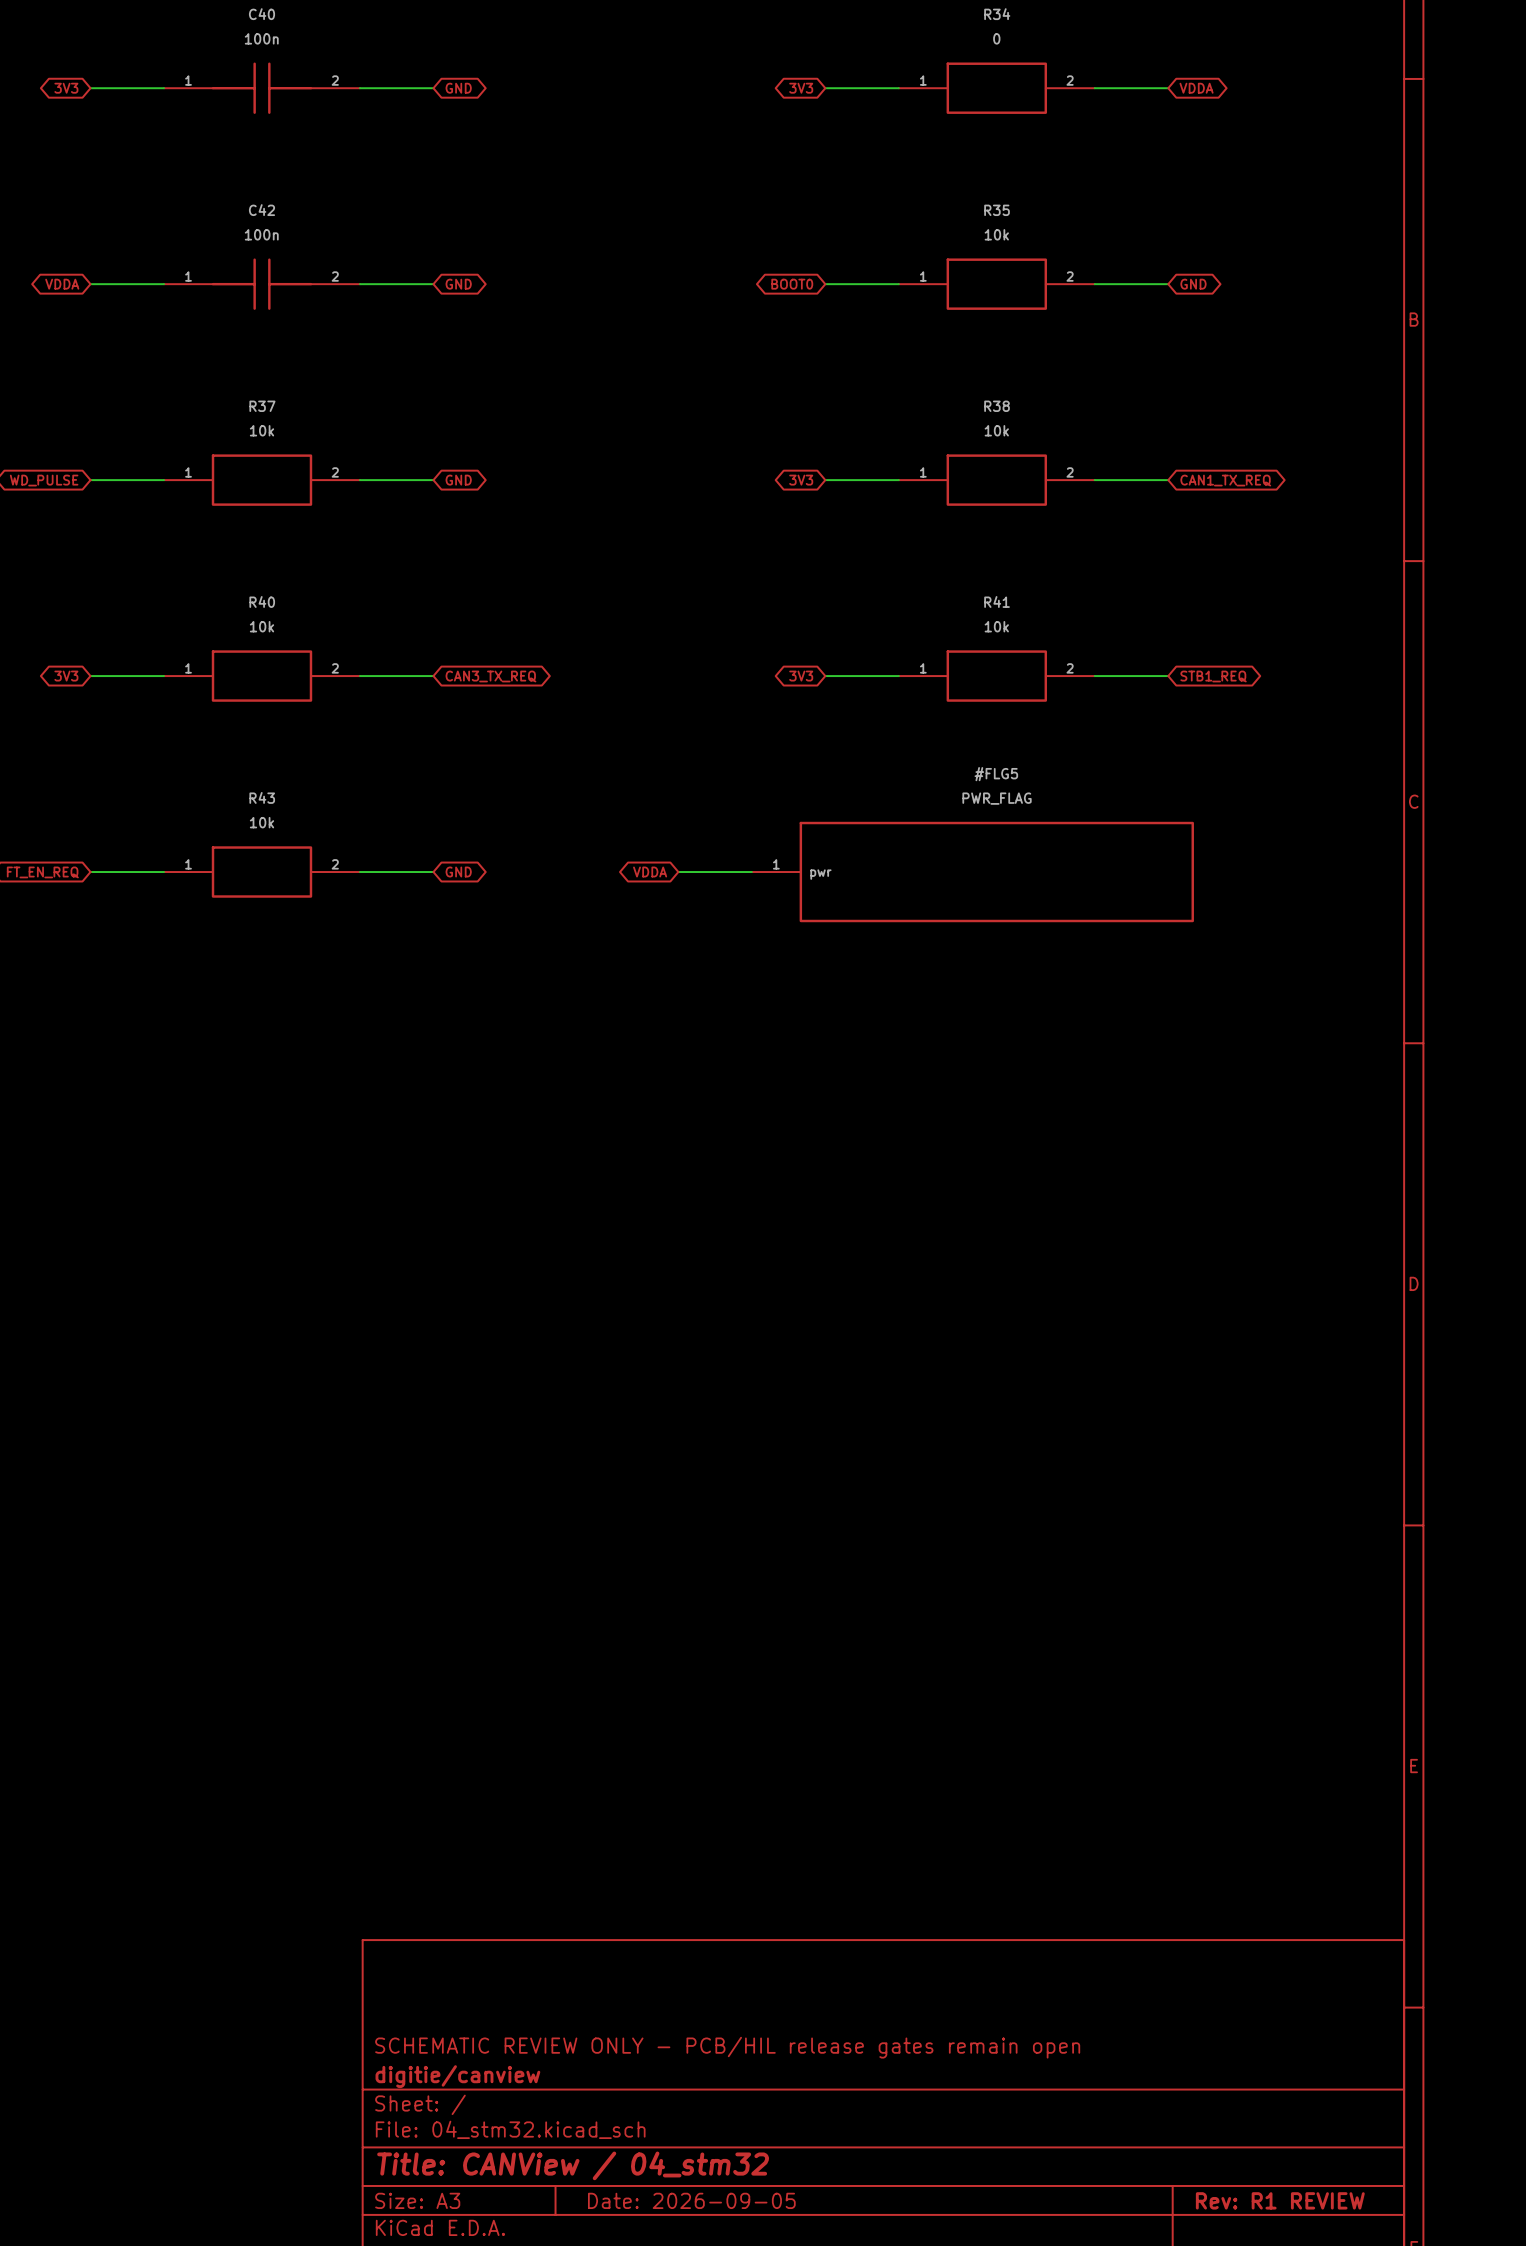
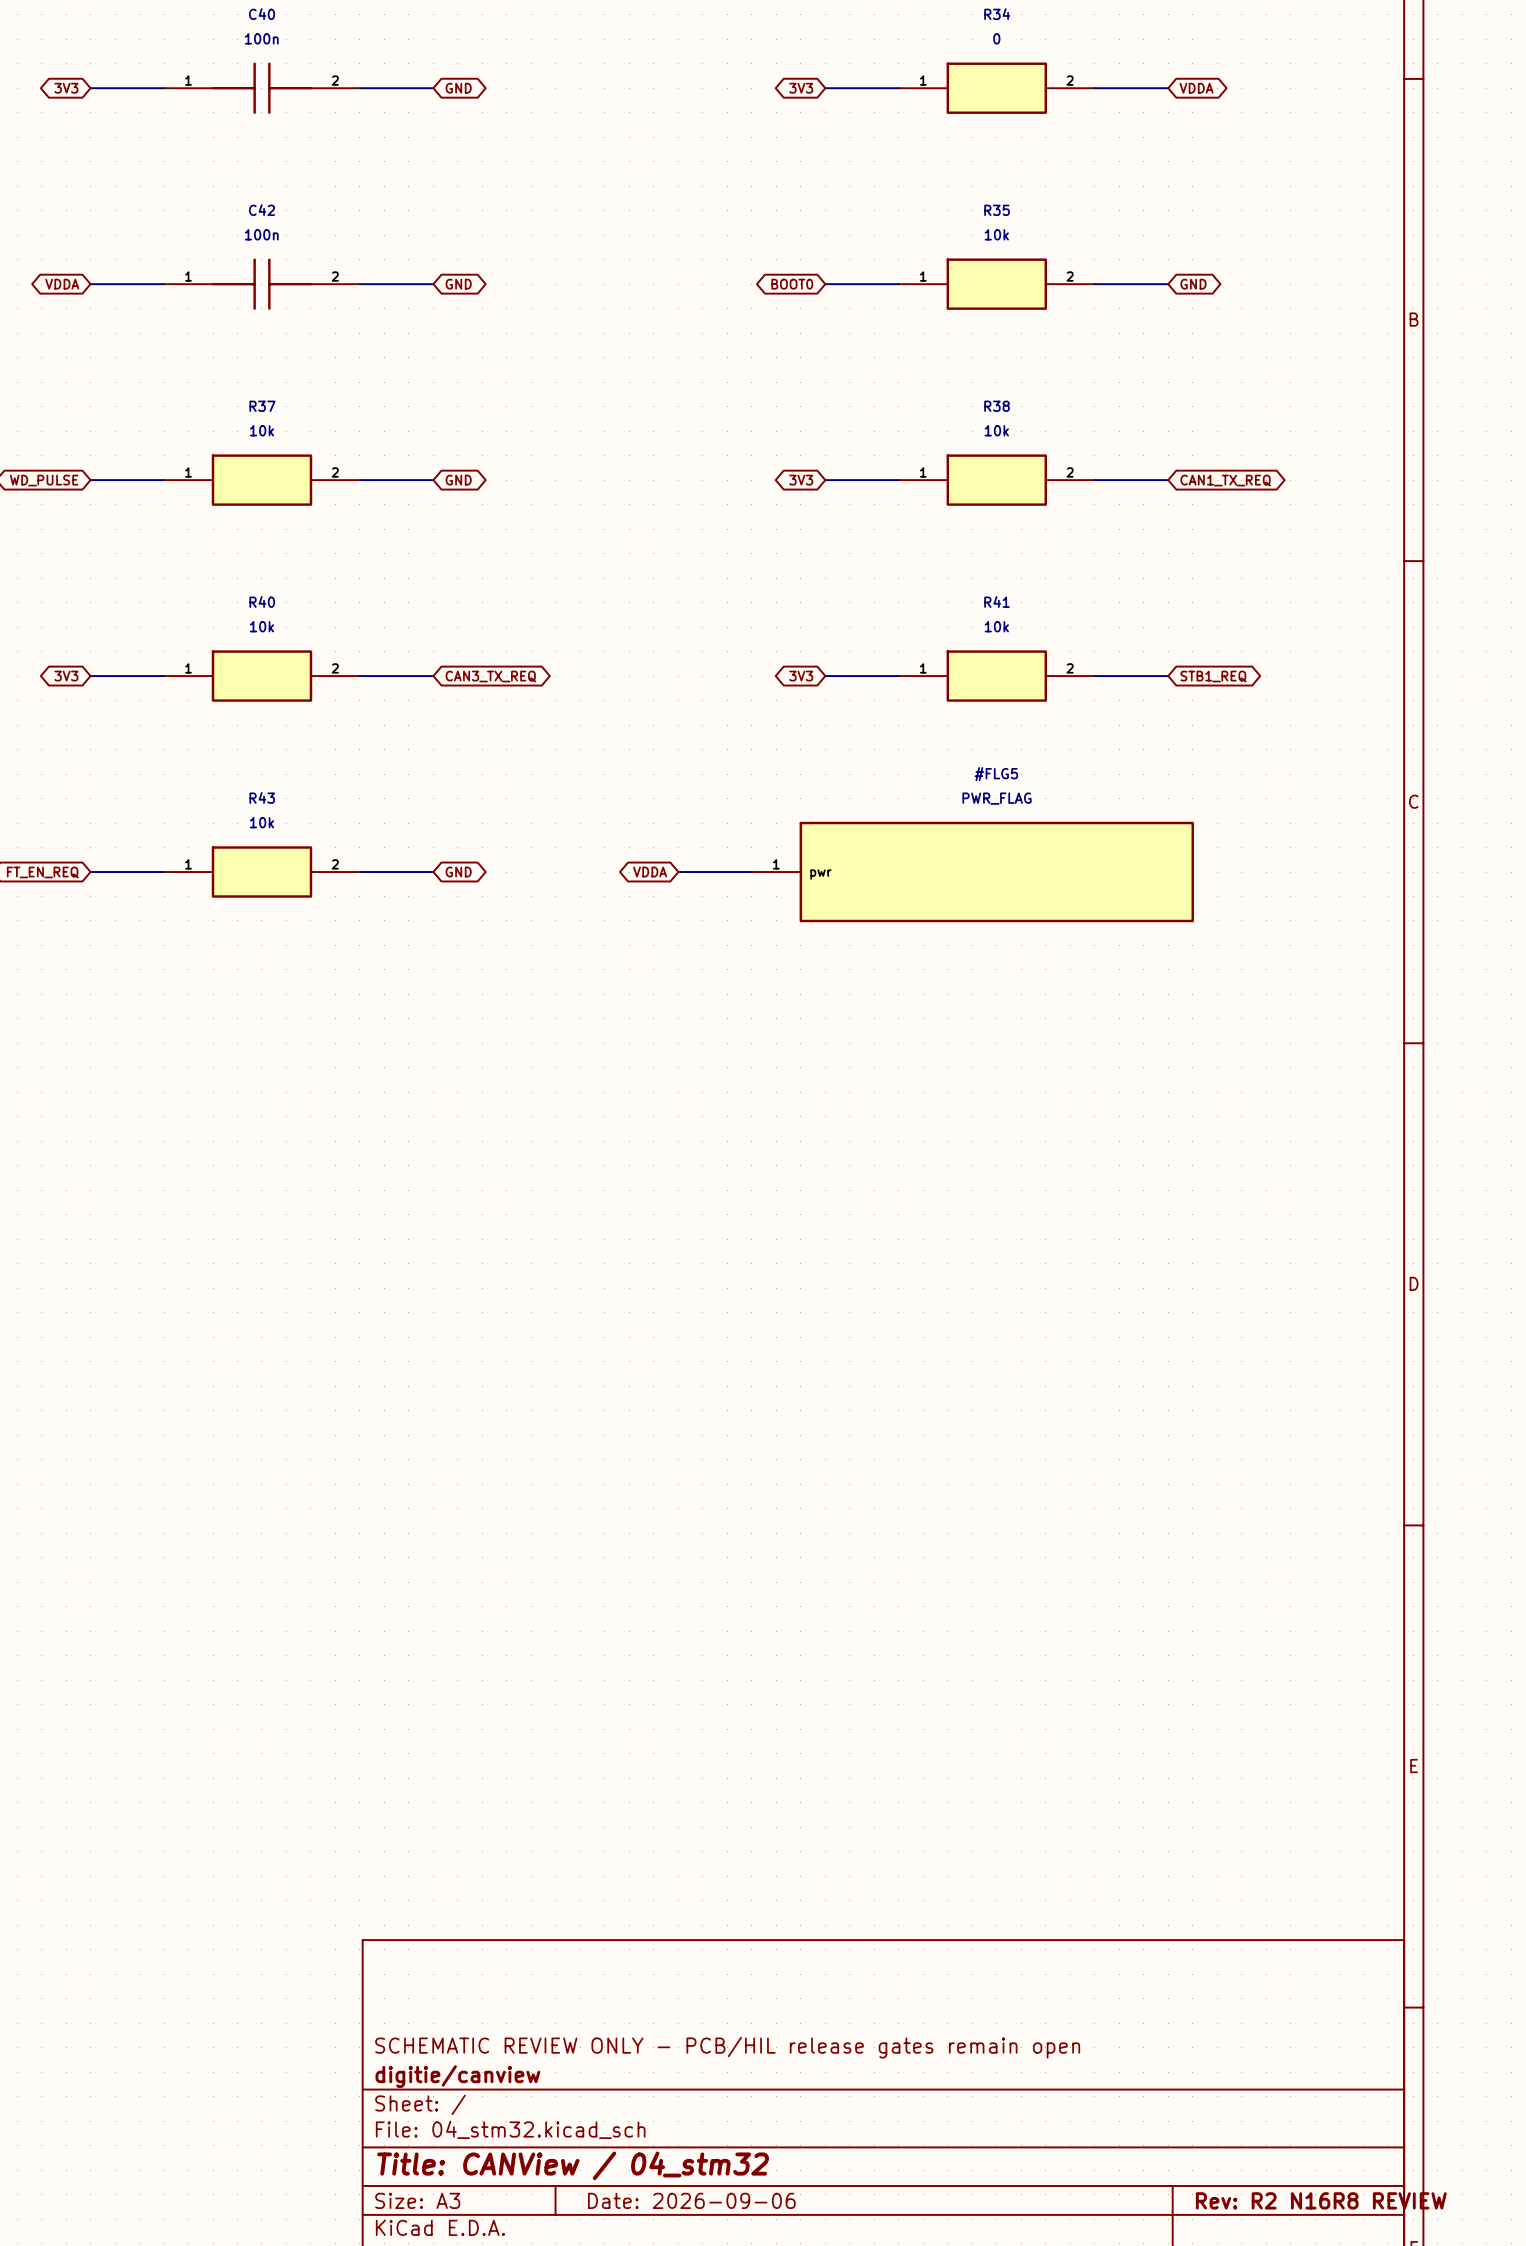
title block: Date: 2026-09-05 (691, 2200) -> Date: 2026-09-06 (691, 2200)
title block: Rev: R1 REVIEW (1280, 2200) -> Rev: R2 N16R8 REVIEW (1321, 2200)

